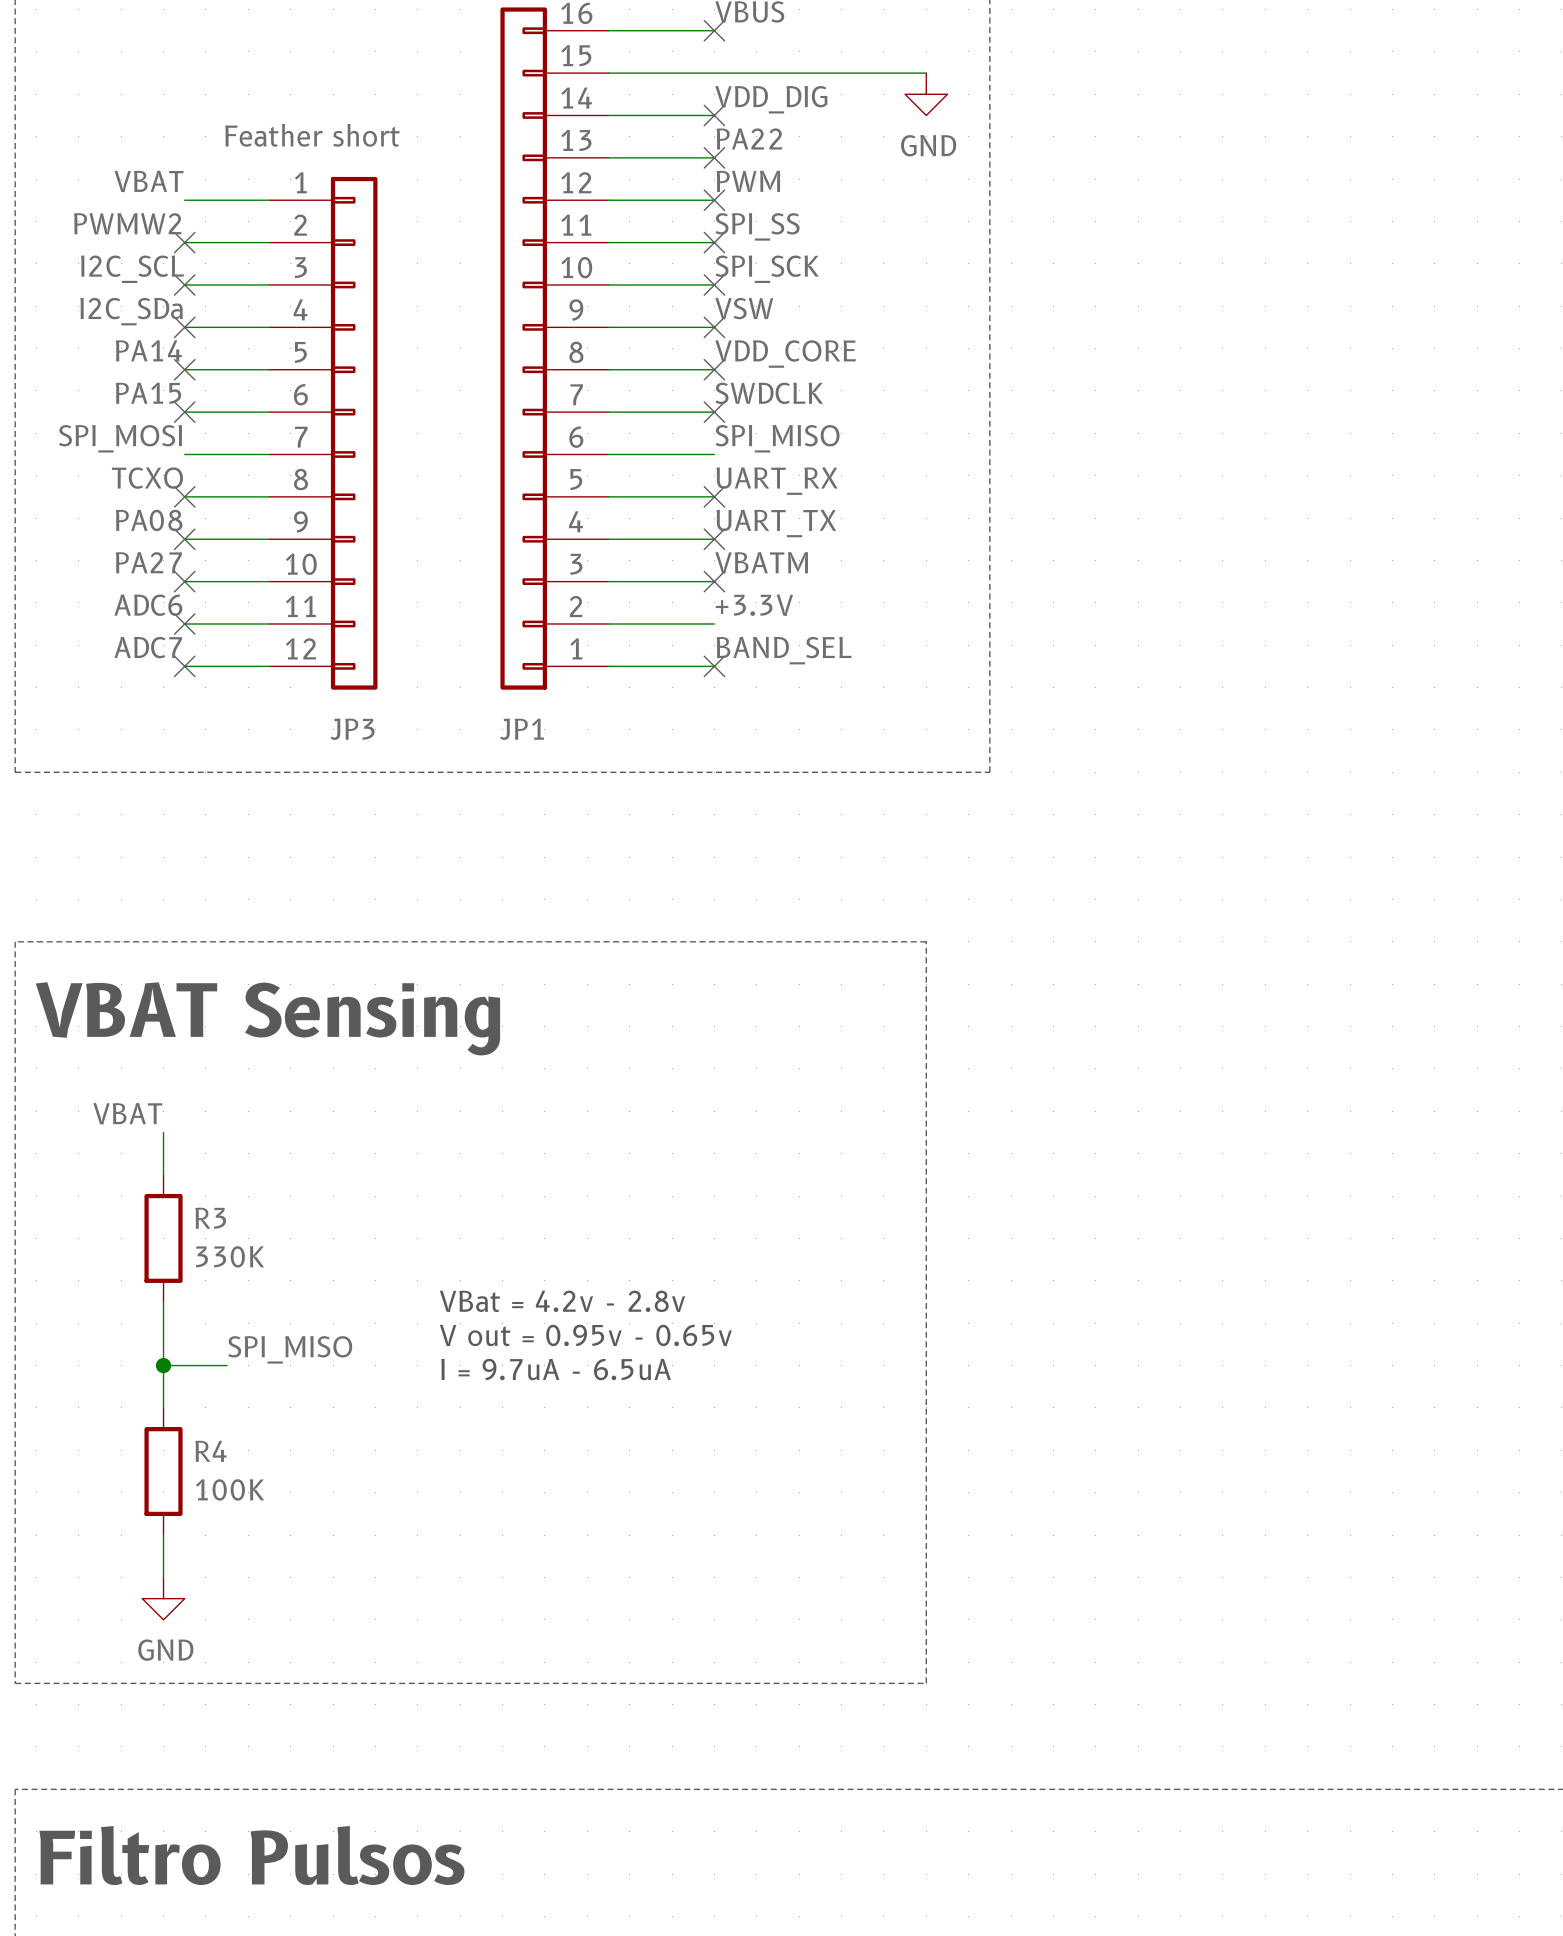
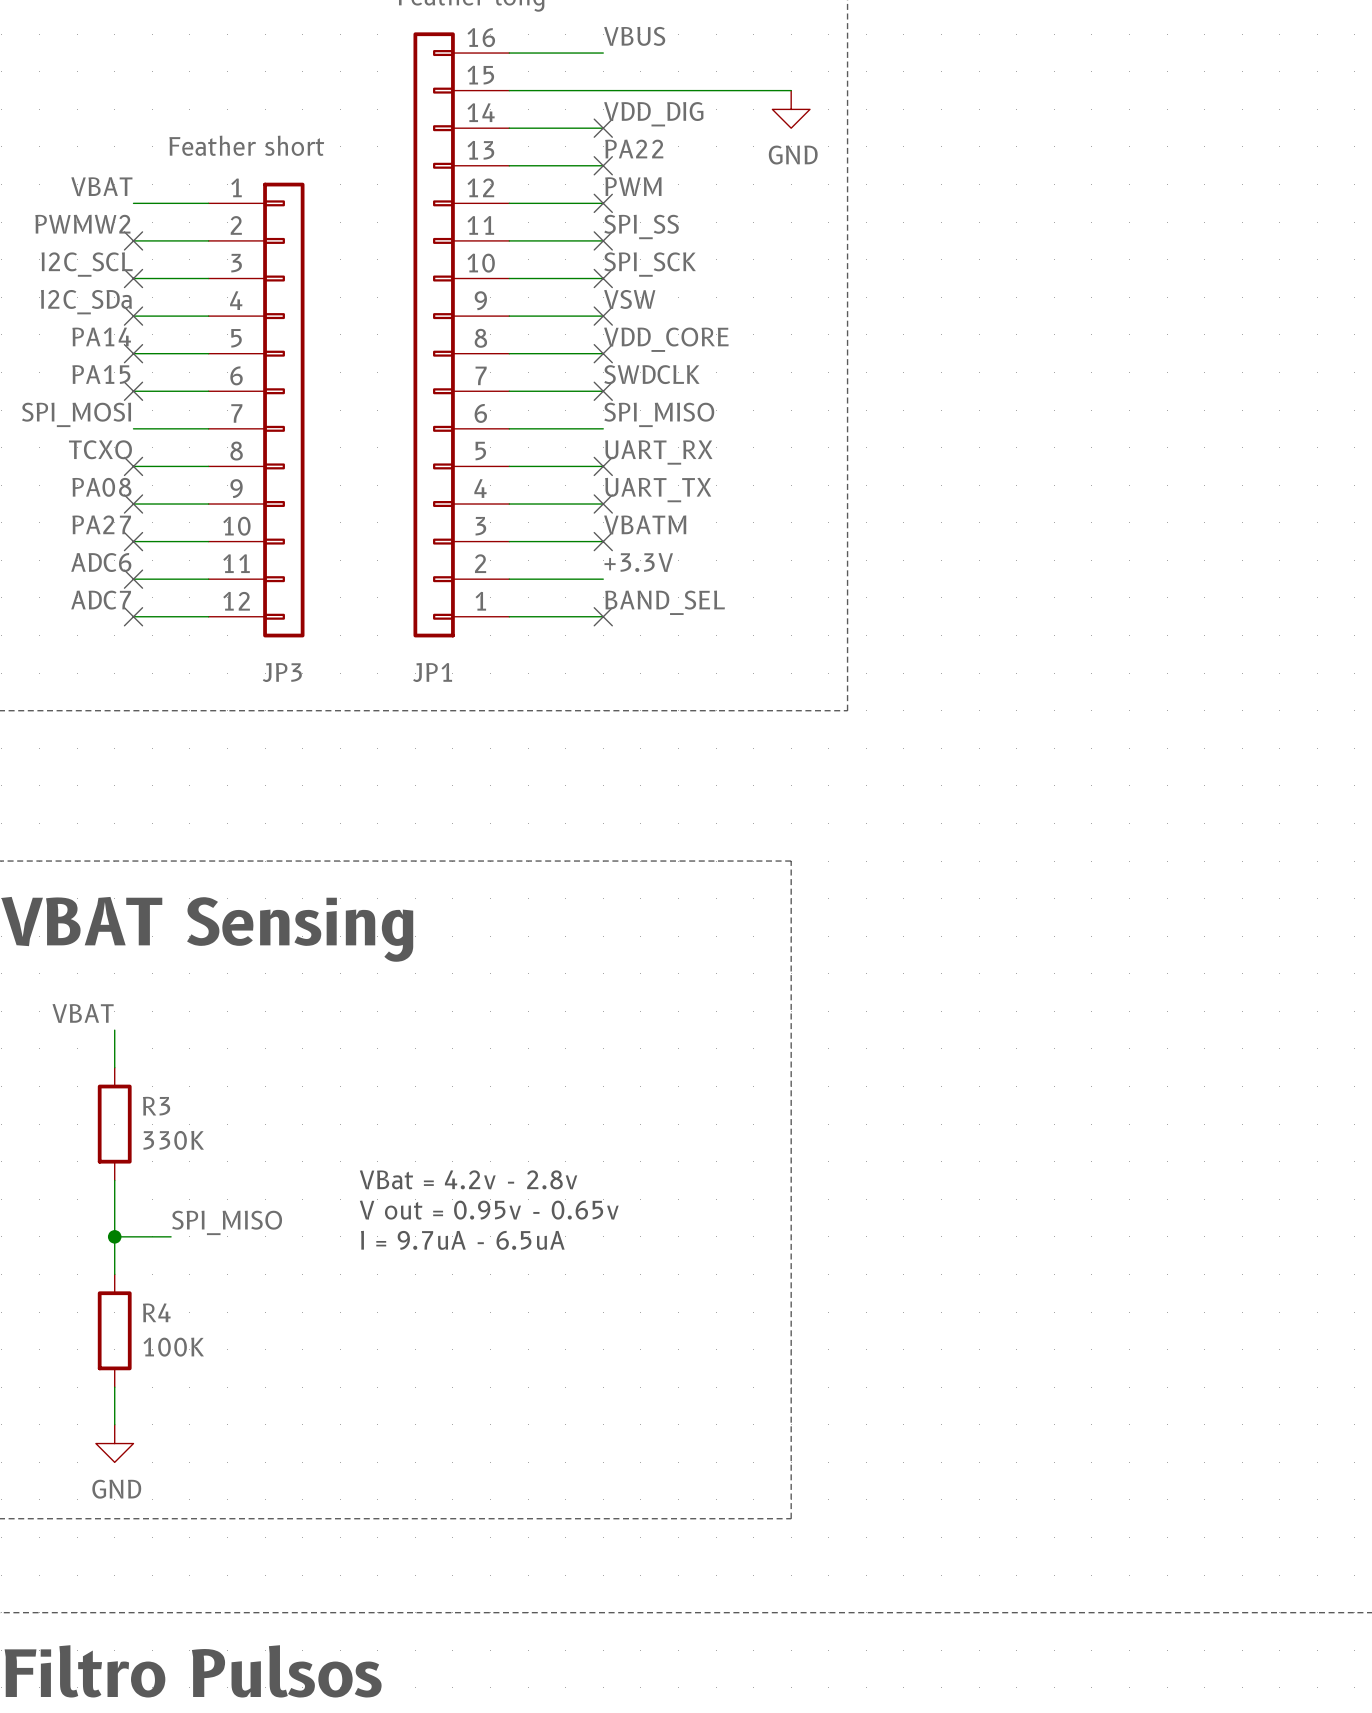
no-connect mark: (714, 30) -> none

